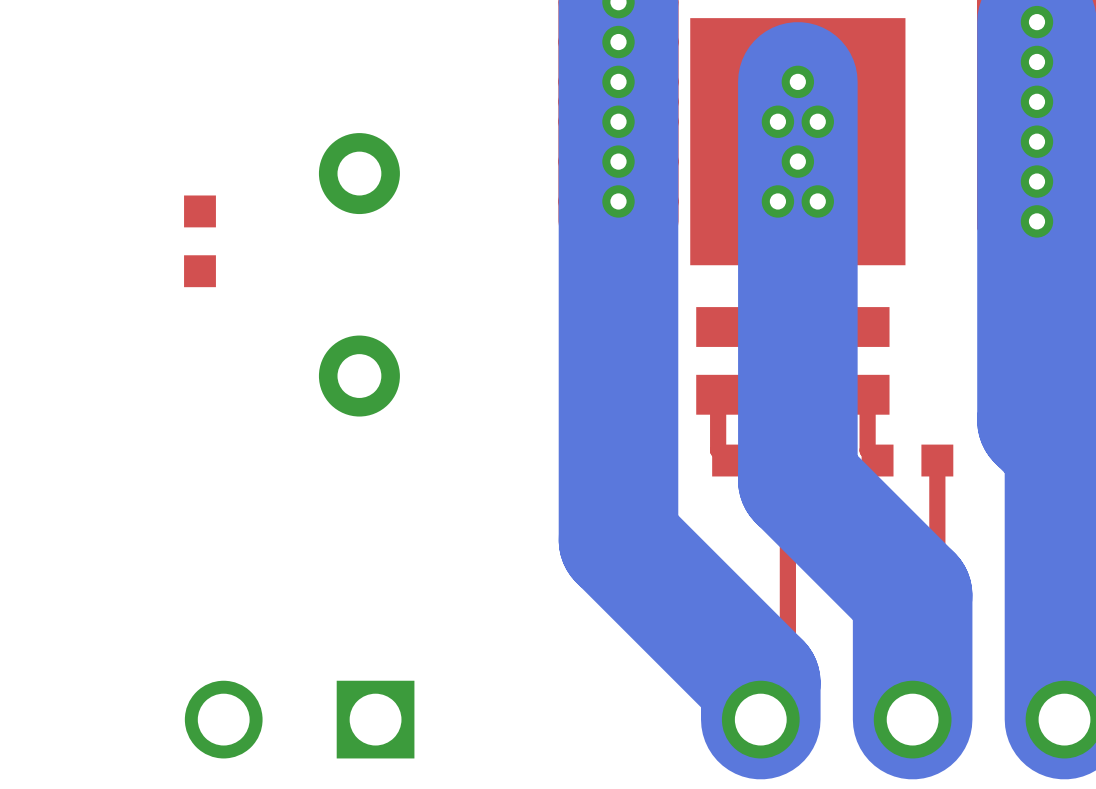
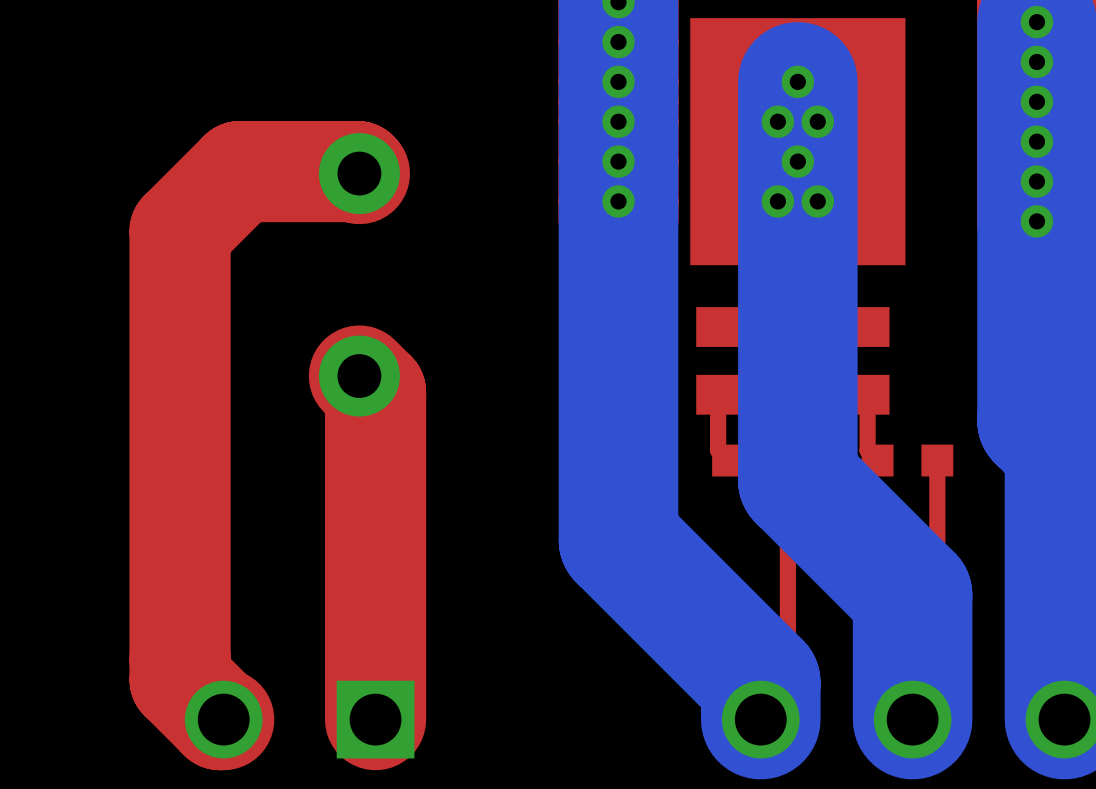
top track: none -> (359, 173) (357, 171) (239, 171) (180, 231) (180, 679) (219, 719) (223, 719)
part: (199, 241) -> none
top track: none -> (359, 376) (375, 392) (375, 719)

